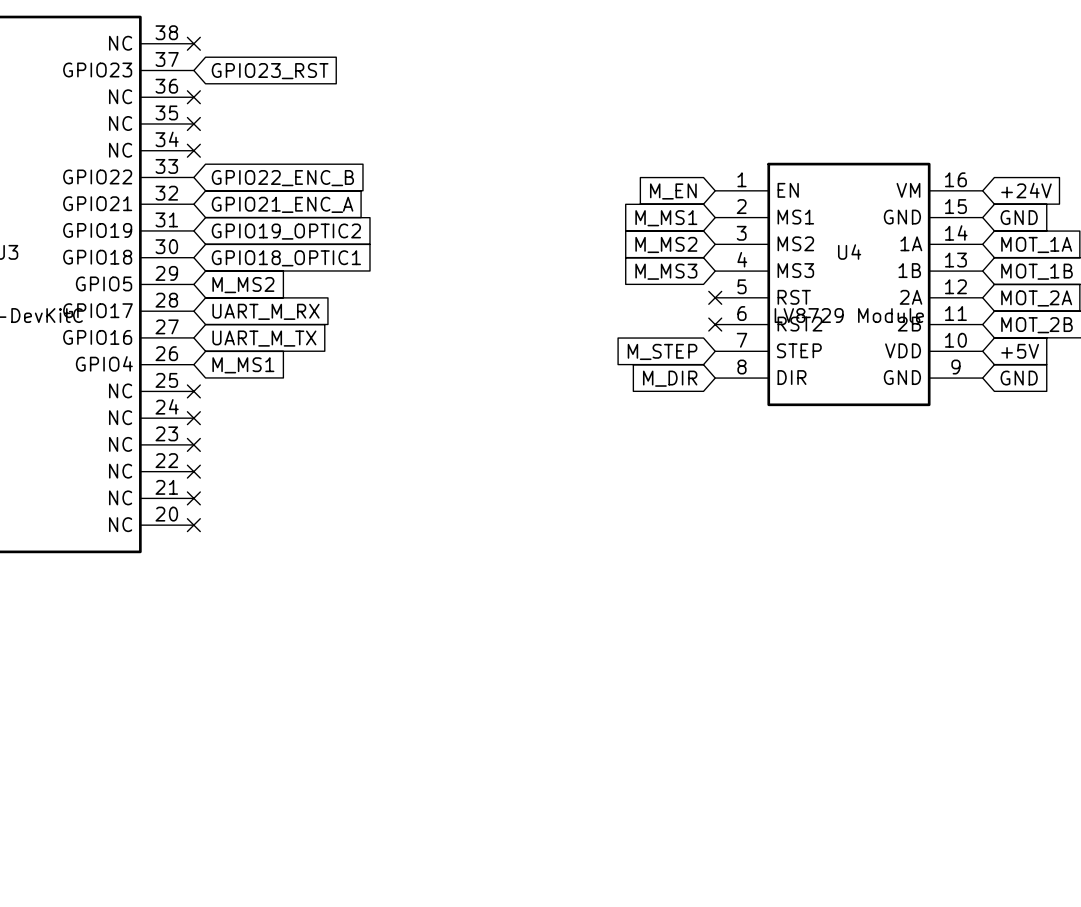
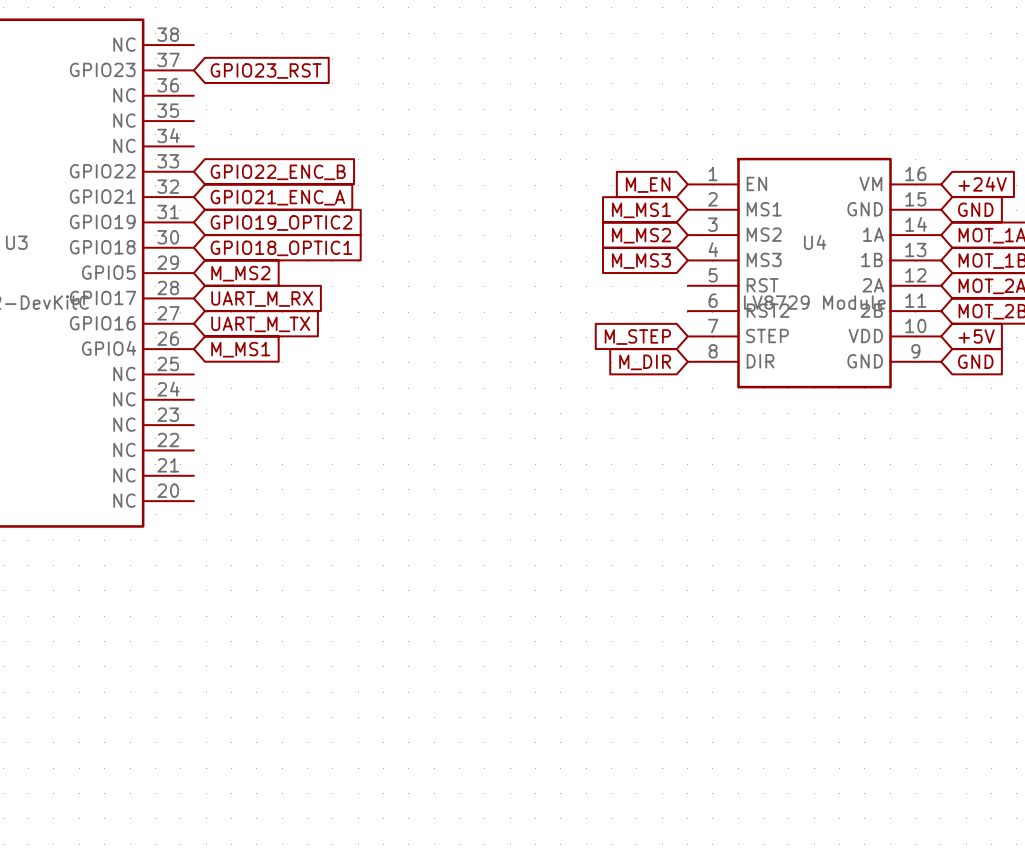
no-connect mark: (193, 43) -> none
no-connect mark: (193, 97) -> none
no-connect mark: (193, 123) -> none
no-connect mark: (193, 150) -> none
no-connect mark: (715, 297) -> none
no-connect mark: (715, 324) -> none
no-connect mark: (193, 391) -> none
no-connect mark: (193, 418) -> none
no-connect mark: (193, 444) -> none
no-connect mark: (193, 471) -> none
no-connect mark: (193, 498) -> none
no-connect mark: (193, 525) -> none

